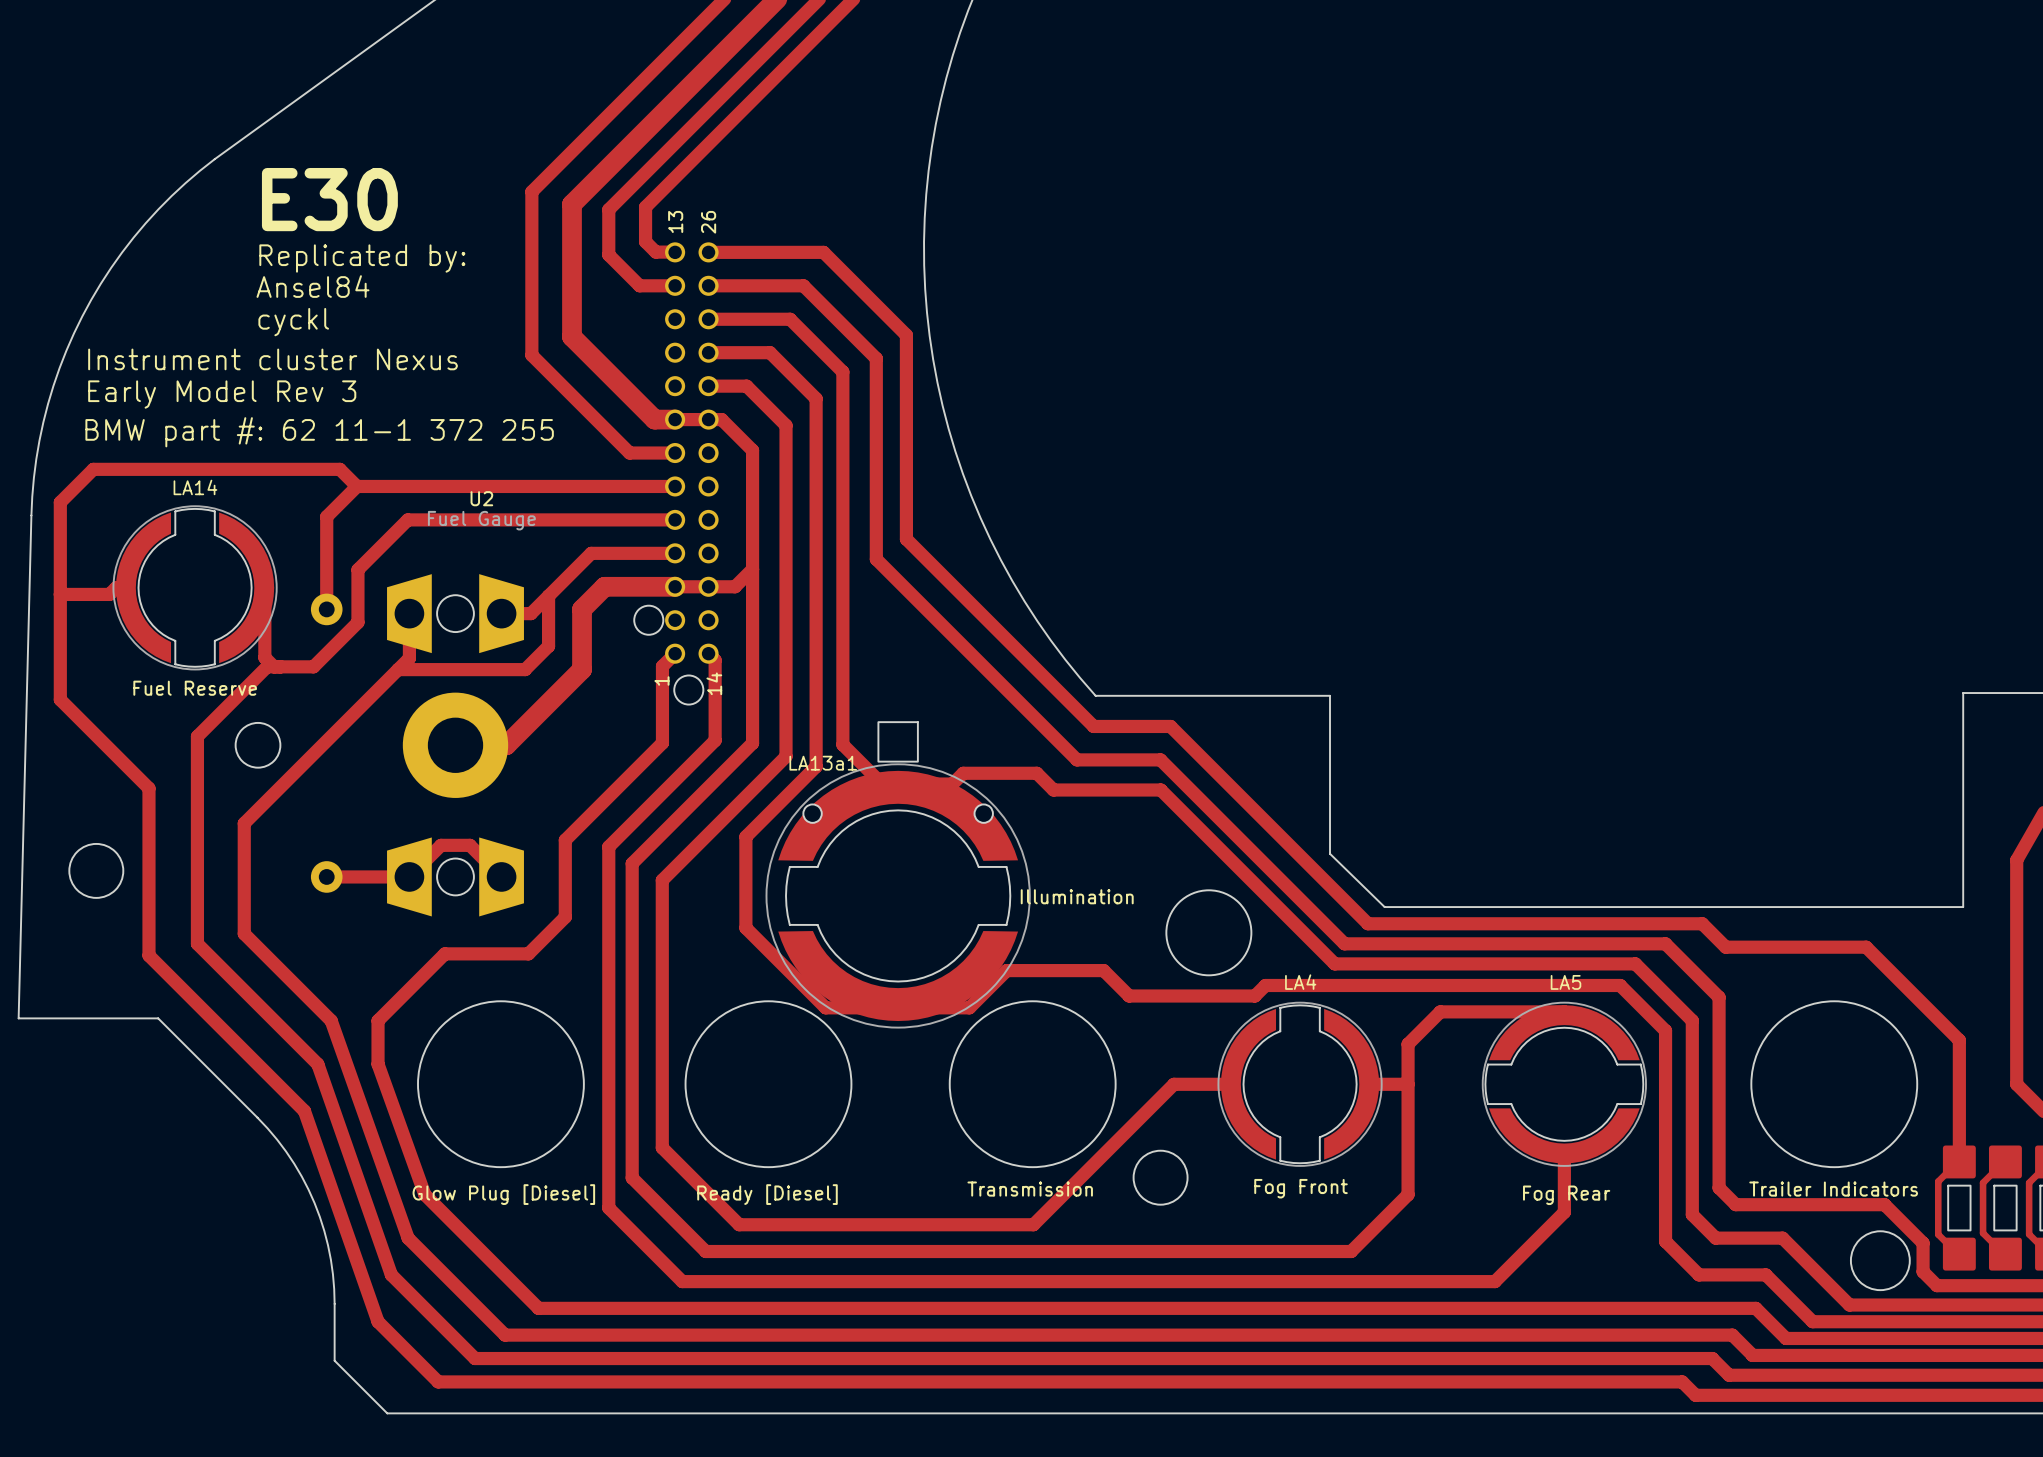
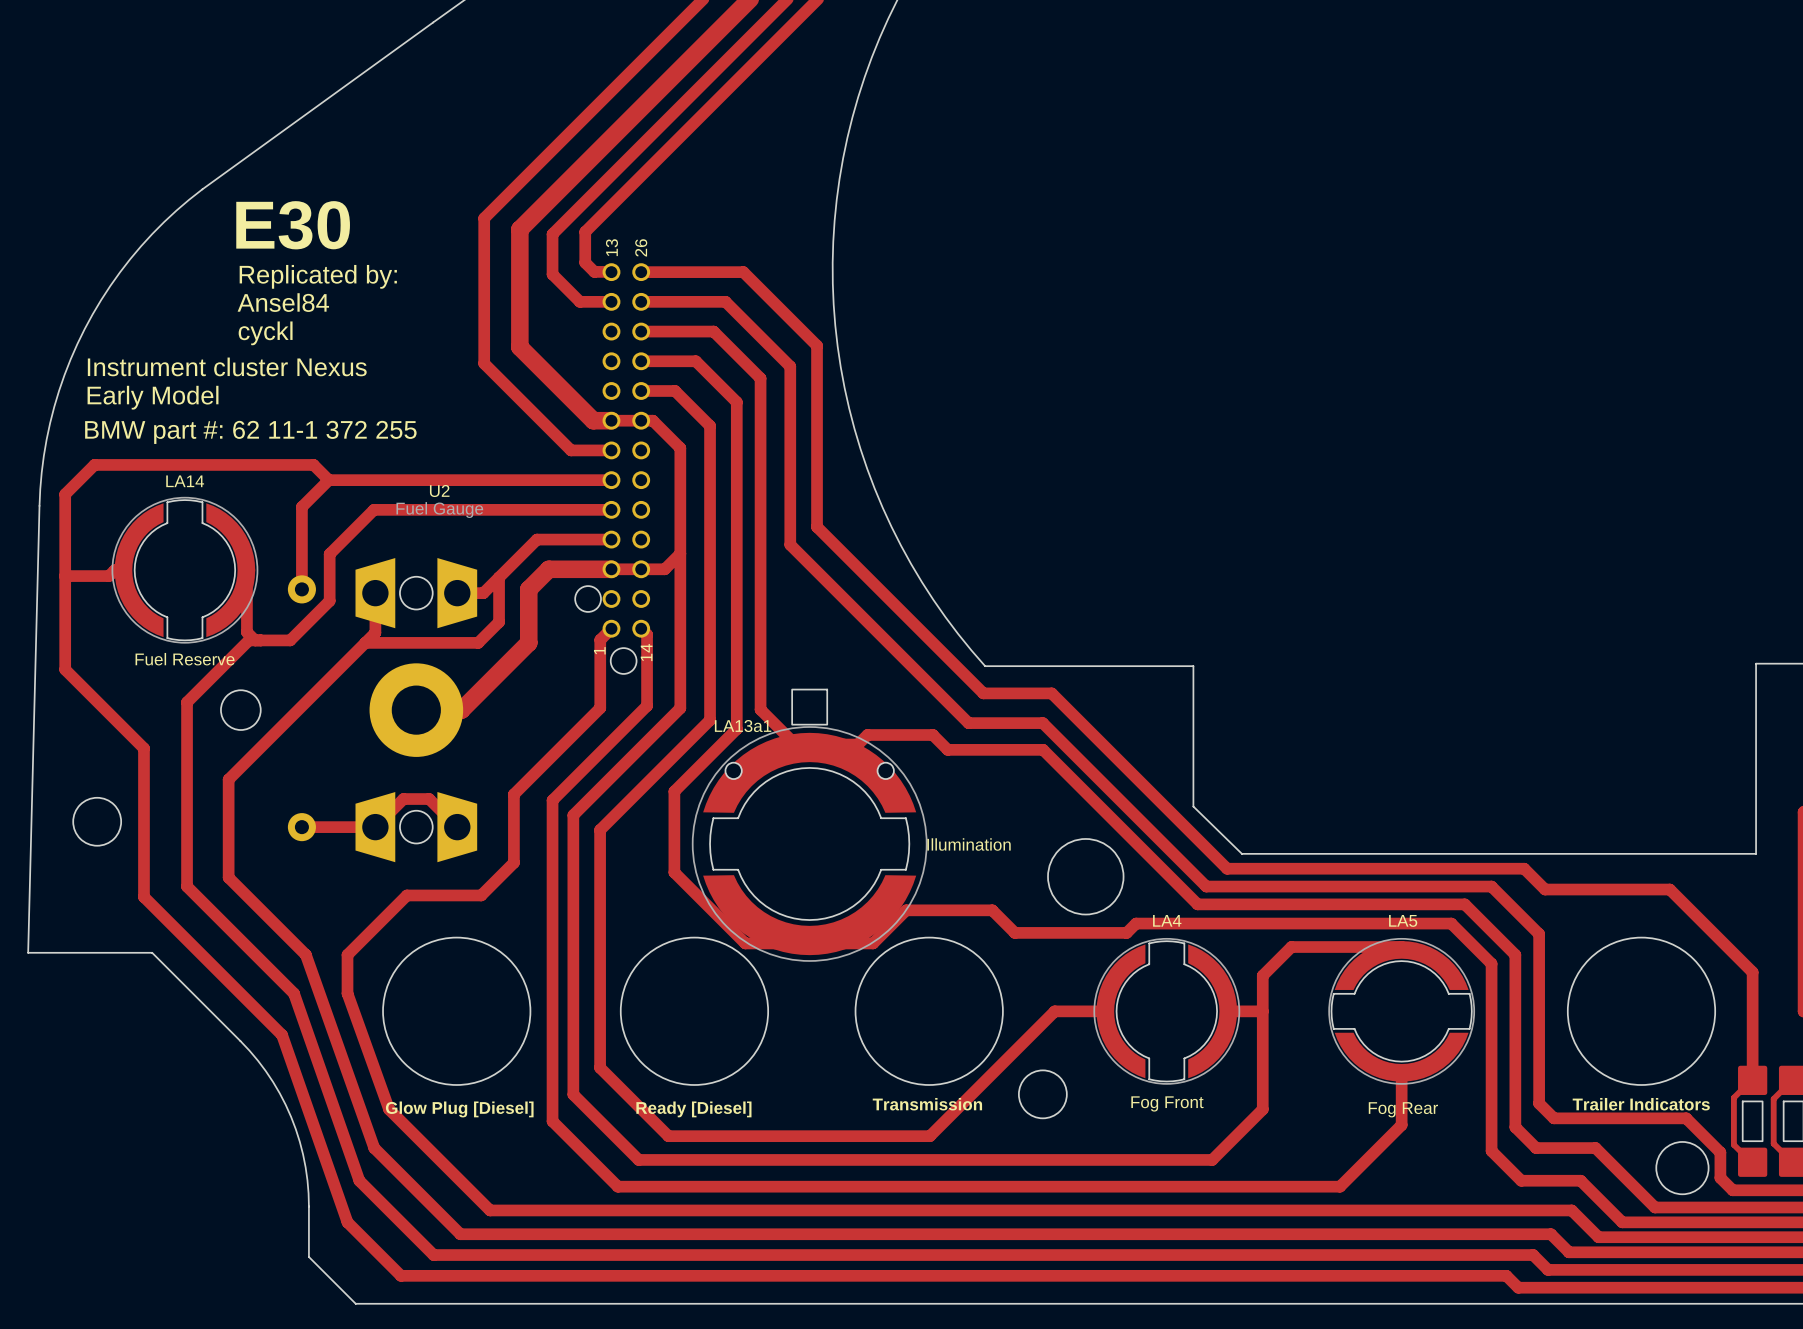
text: Early Model Rev 3 (222, 394) -> Early Model (153, 397)

